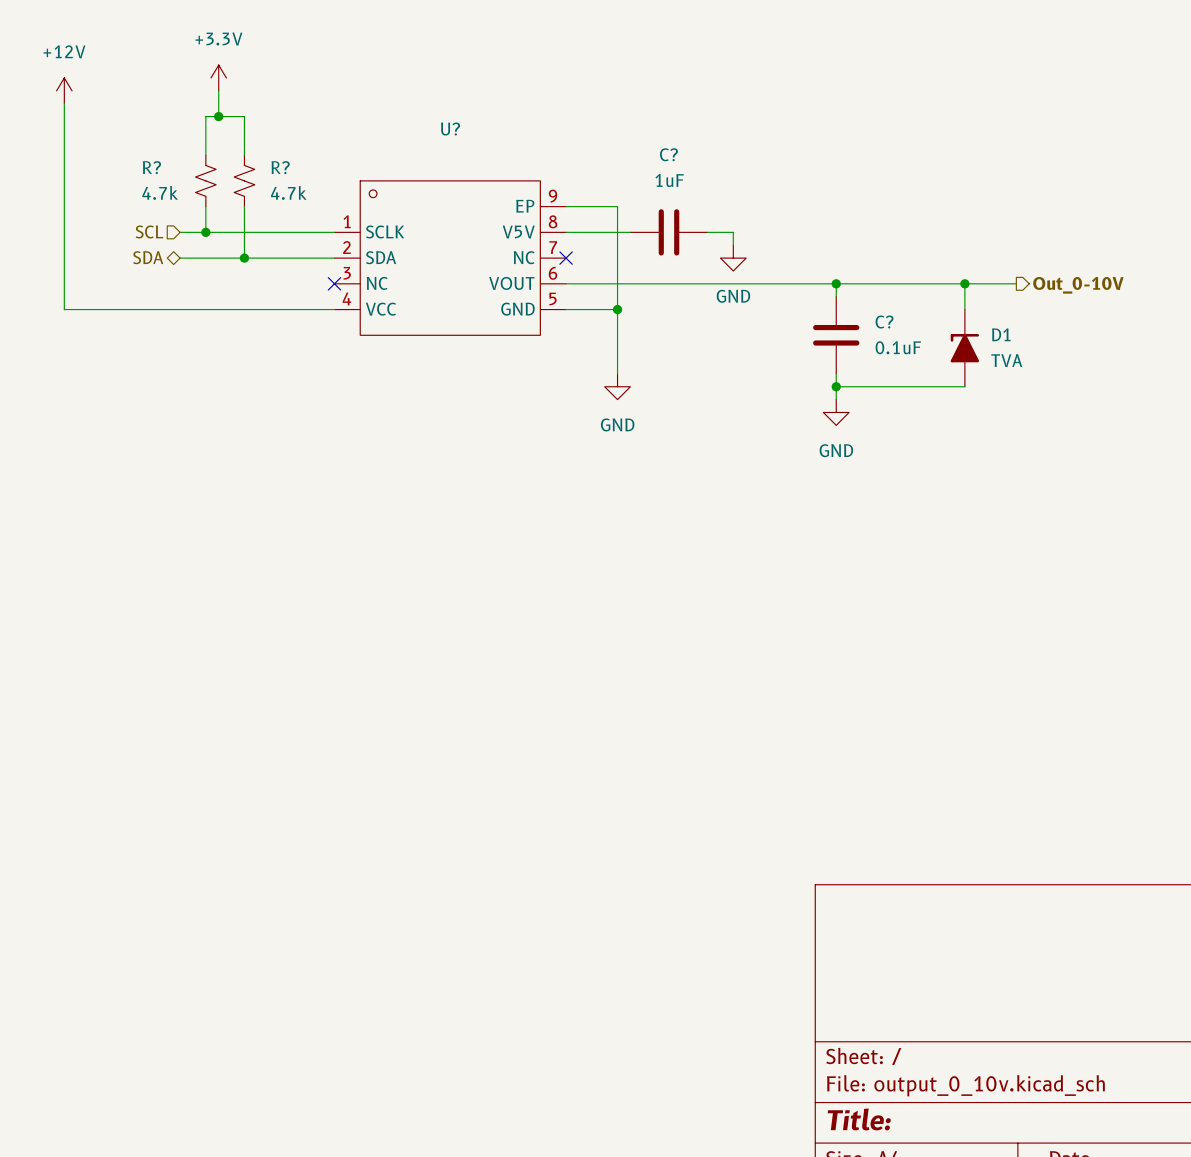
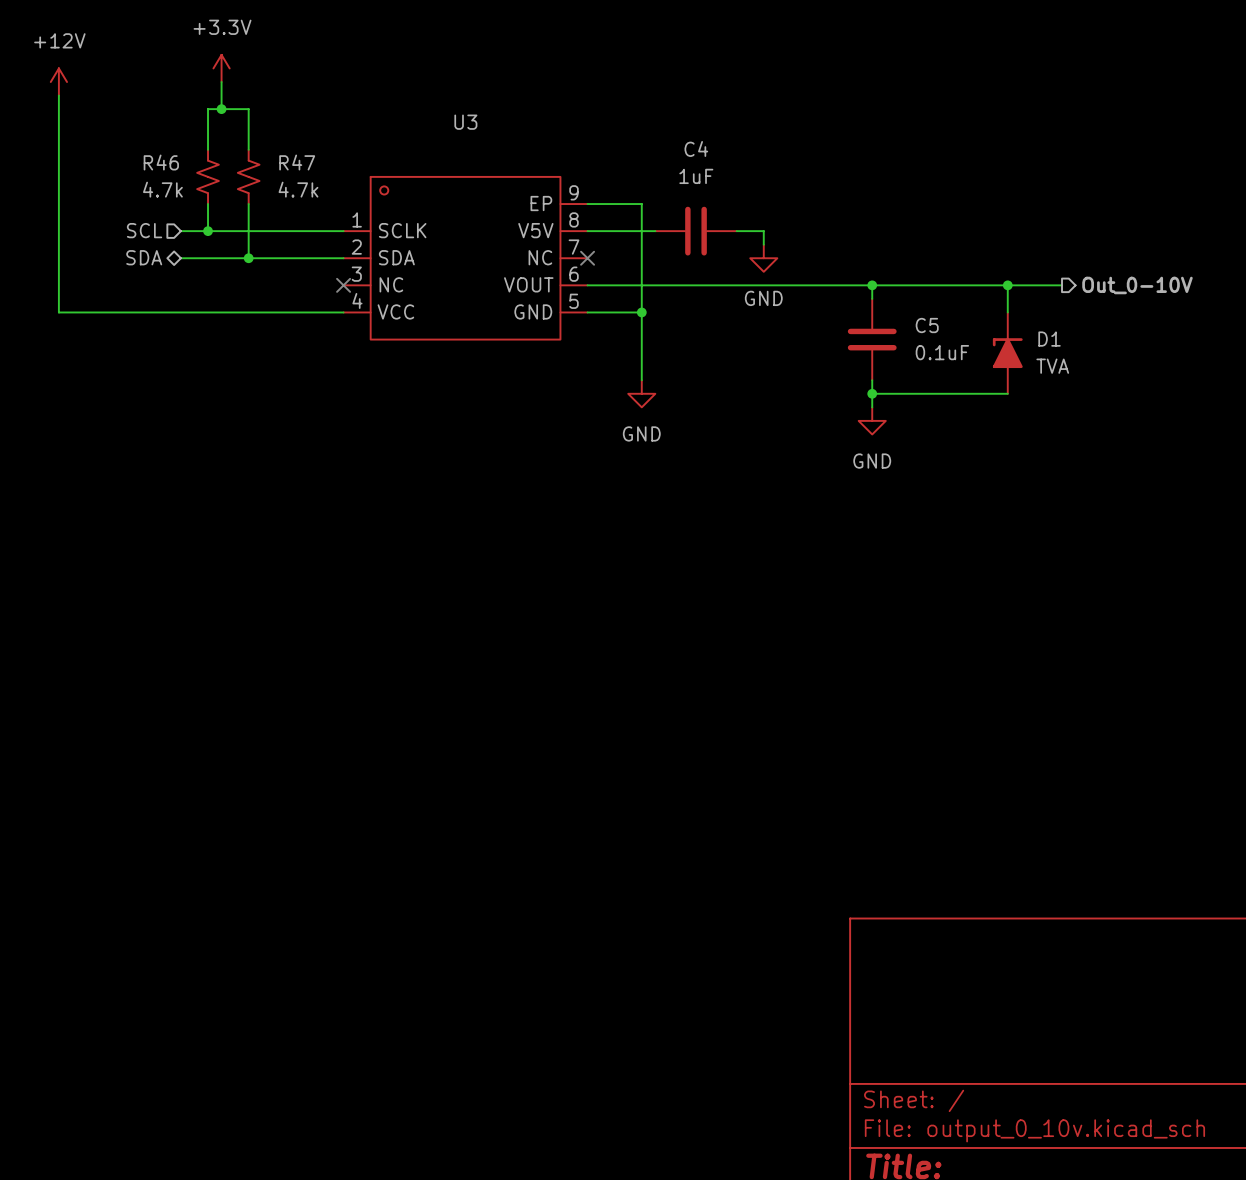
U? name: U? (450, 129) -> U3 (465, 122)
C? name: C? (668, 154) -> C4 (696, 148)
R? name: R? (151, 167) -> R46 (161, 162)
R? name: R? (280, 167) -> R47 (297, 162)
C? name: C? (884, 322) -> C5 (927, 325)

